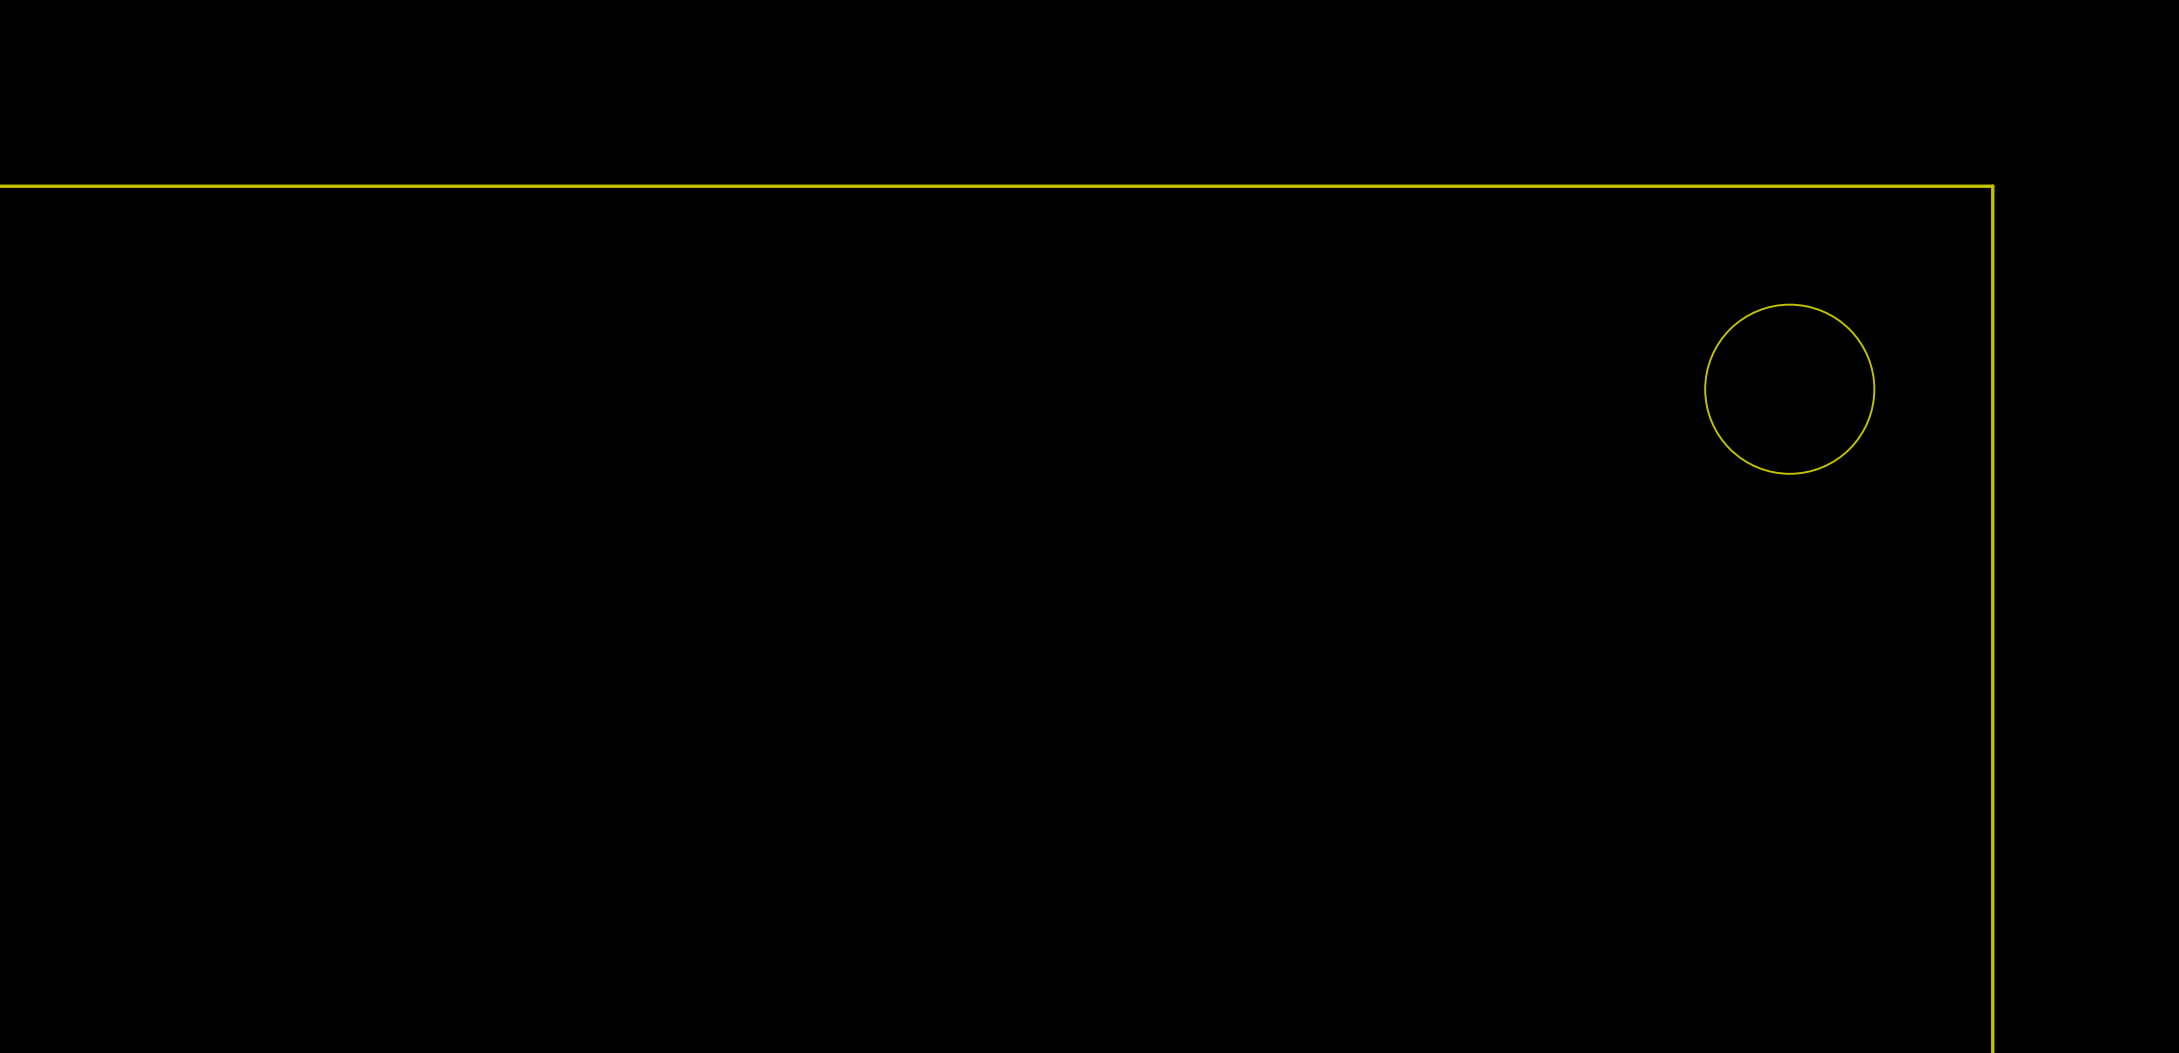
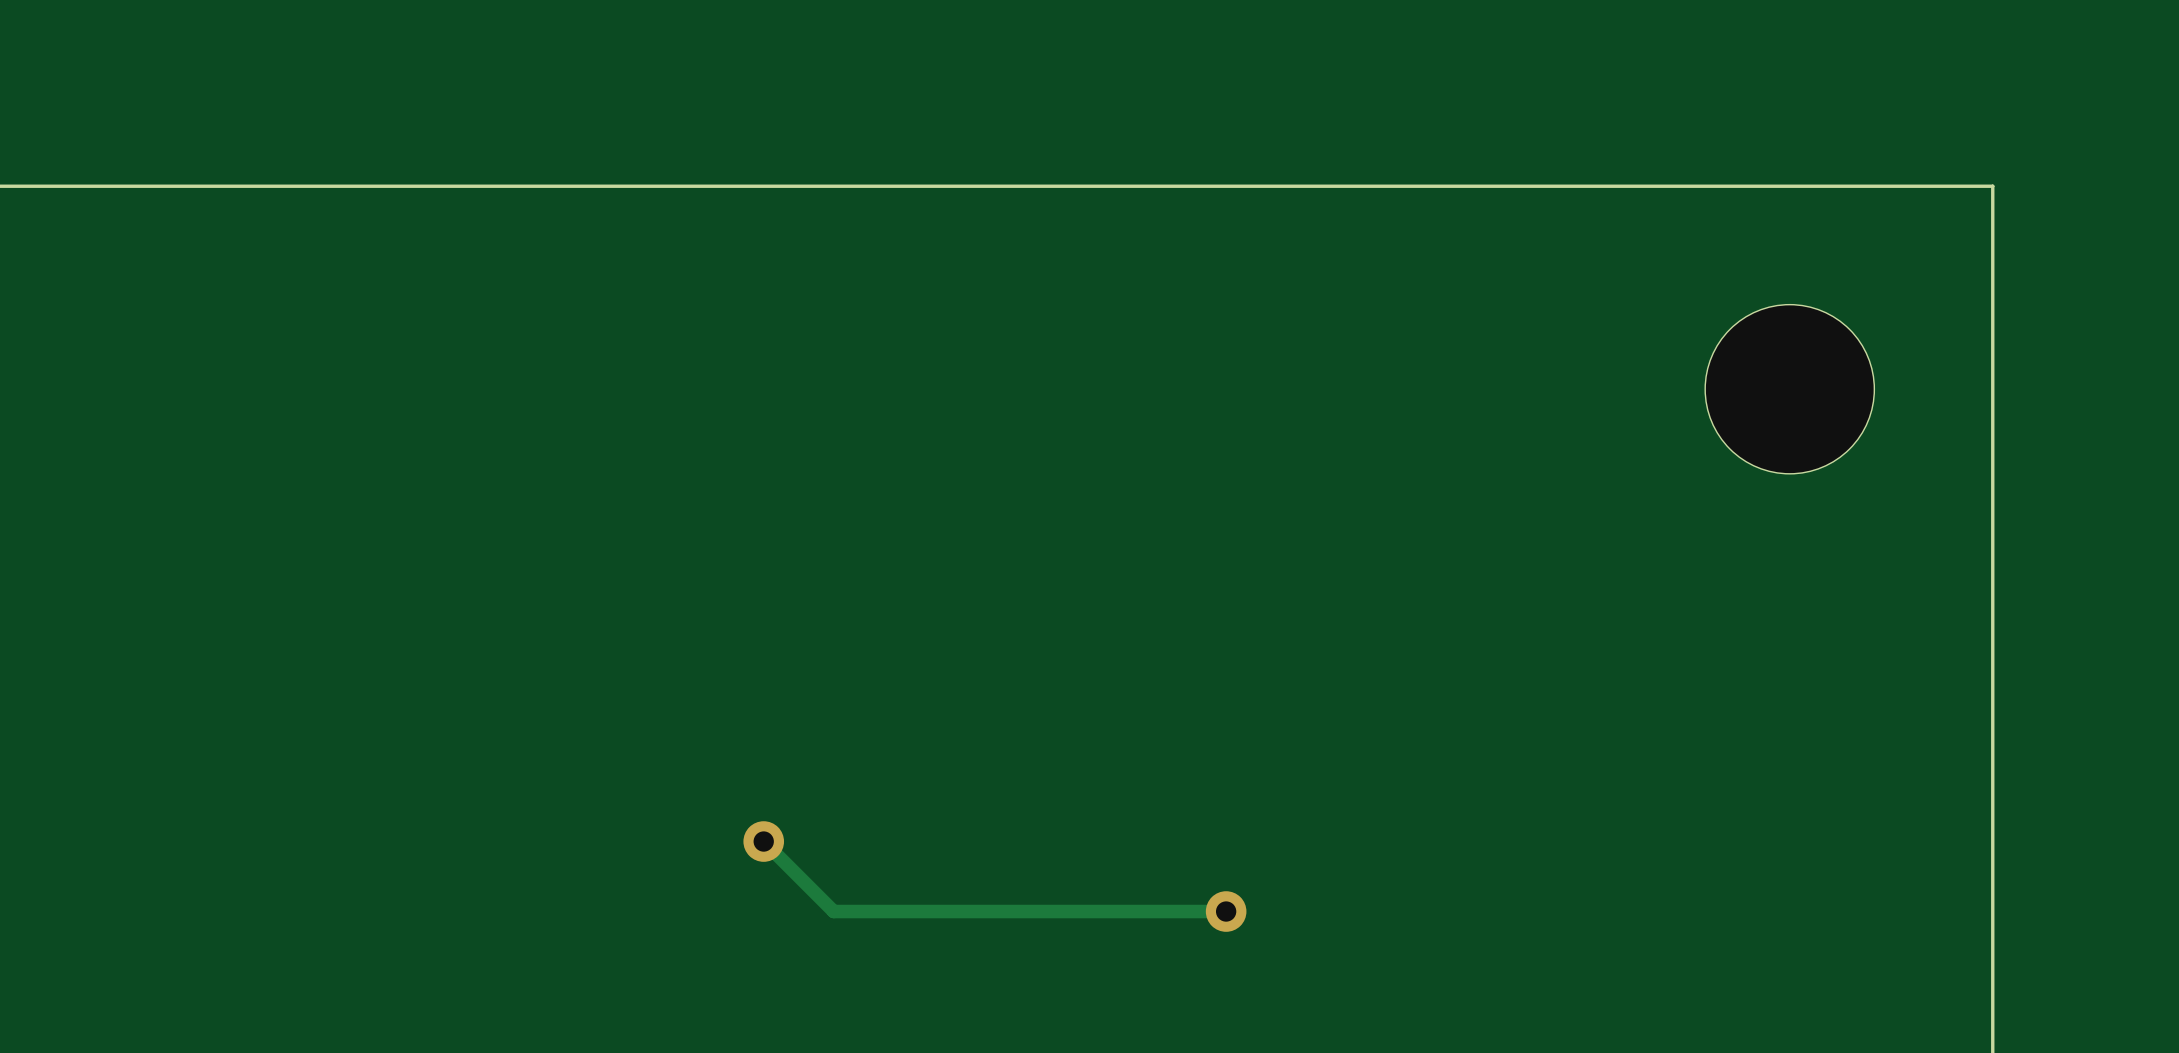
track: none -> (763, 841) (833, 911) (1226, 911)
via: none -> (763, 841)
via: none -> (1226, 911)

